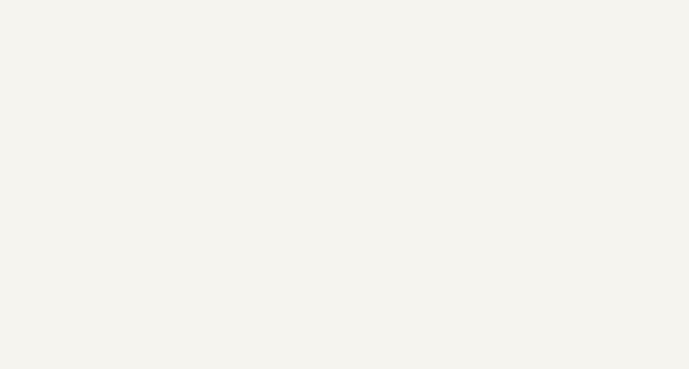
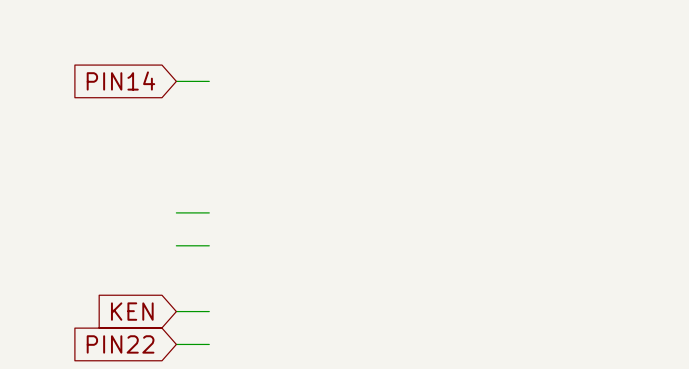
global label: none -> PIN14 (120, 81)
wire: none -> (176, 81) (209, 81)
wire: none -> (176, 212) (209, 212)
wire: none -> (176, 245) (209, 245)
global label: none -> KEN (132, 311)
wire: none -> (176, 311) (209, 311)
global label: none -> PIN22 (120, 344)
wire: none -> (176, 344) (209, 344)

